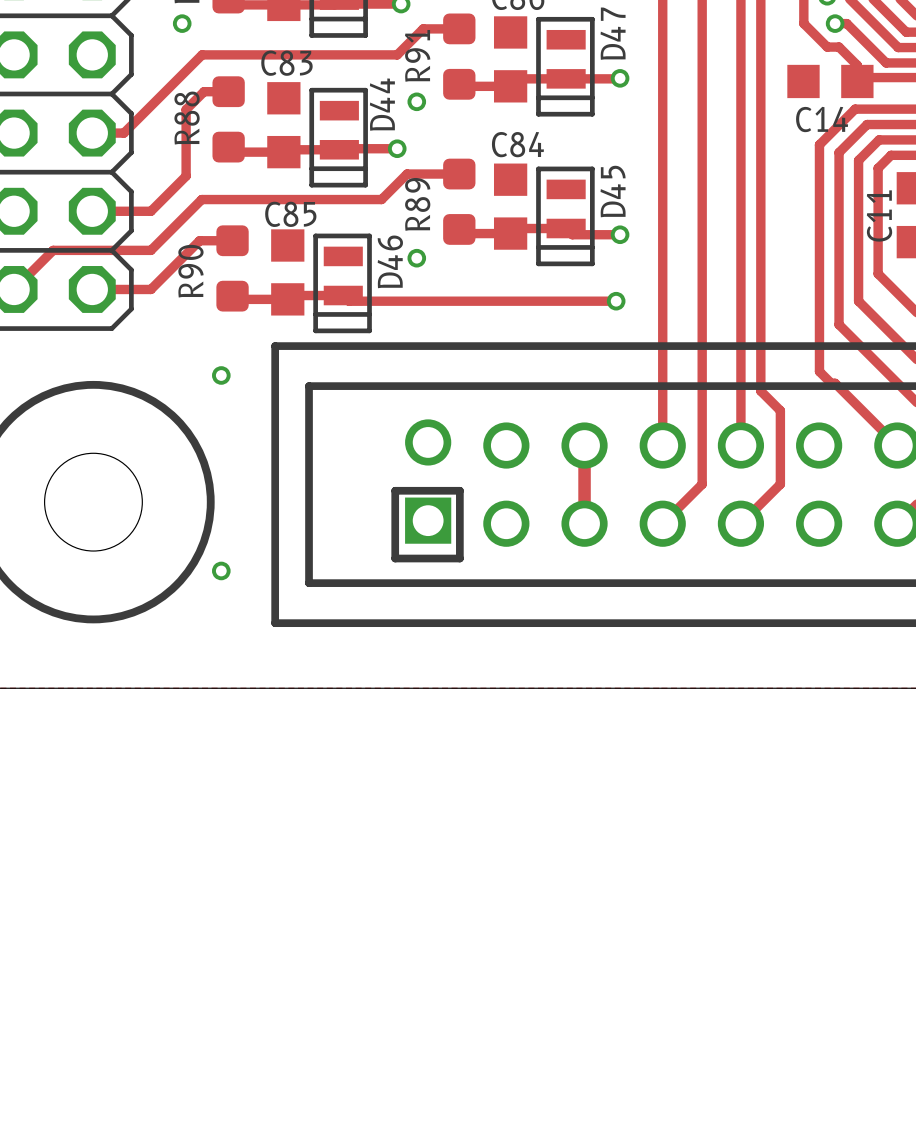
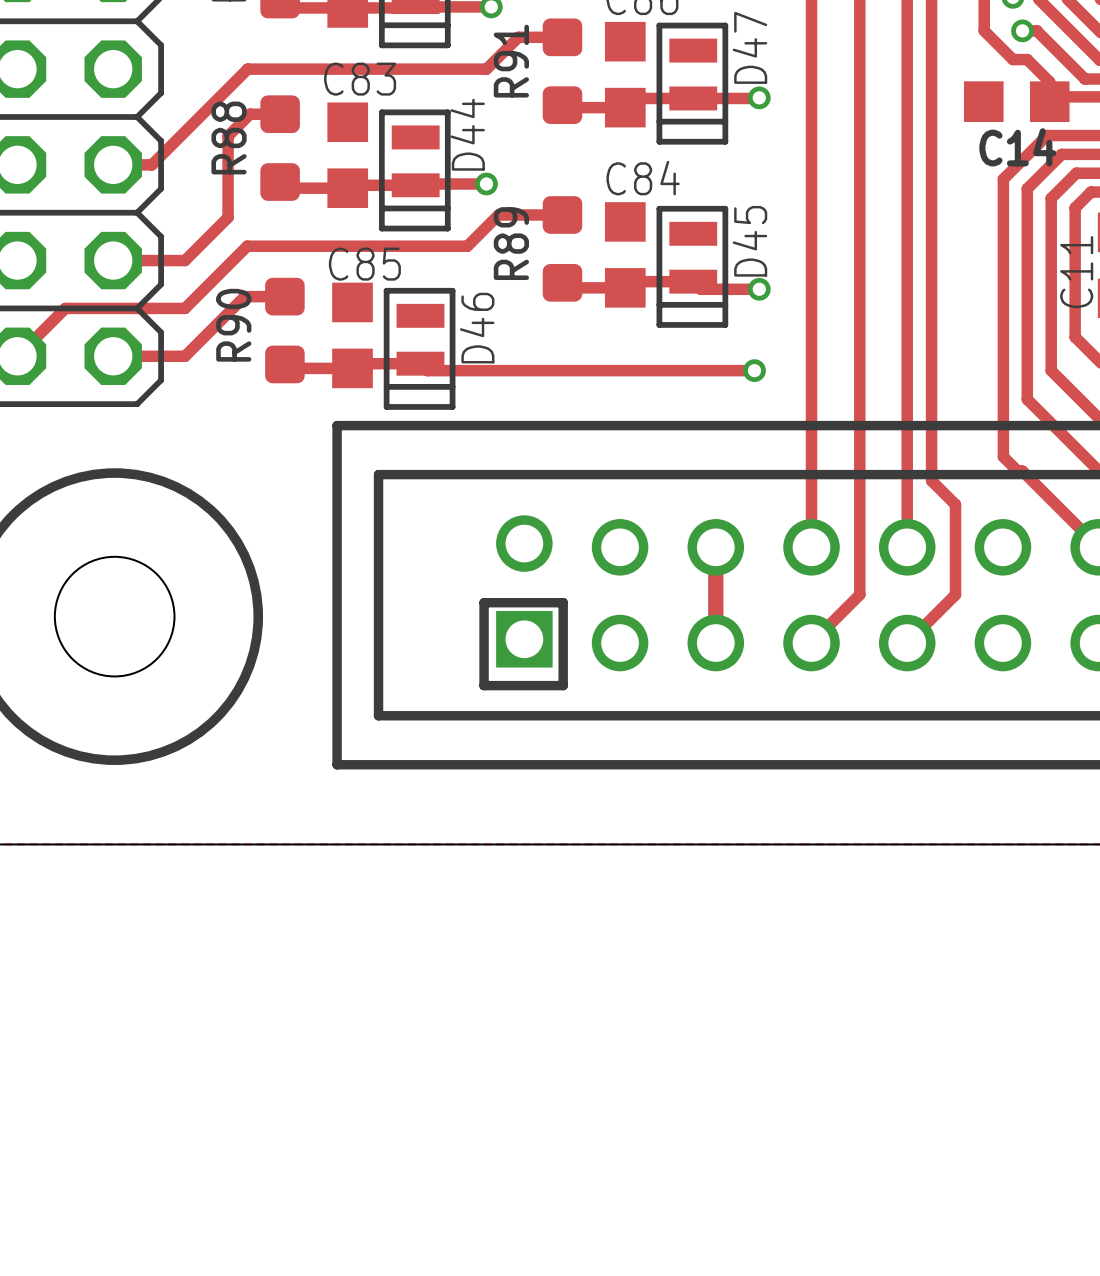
via: (182, 23) -> none
via: (416, 101) -> none
via: (416, 258) -> none
via: (221, 375) -> none
via: (221, 570) -> none

